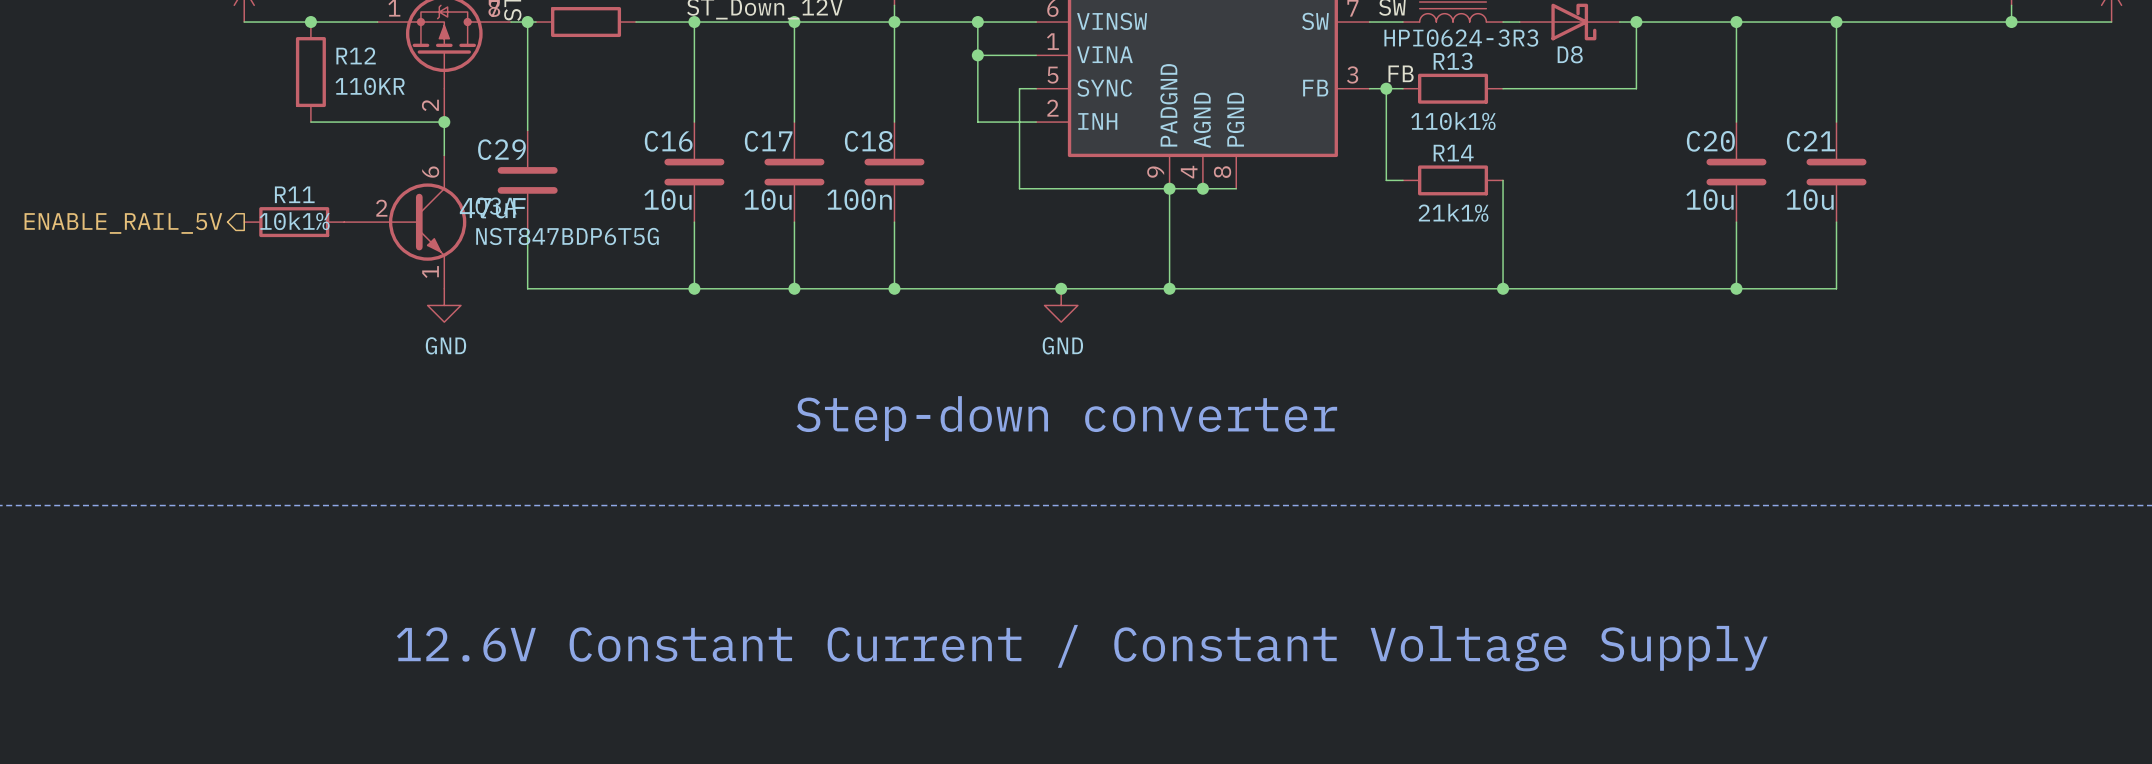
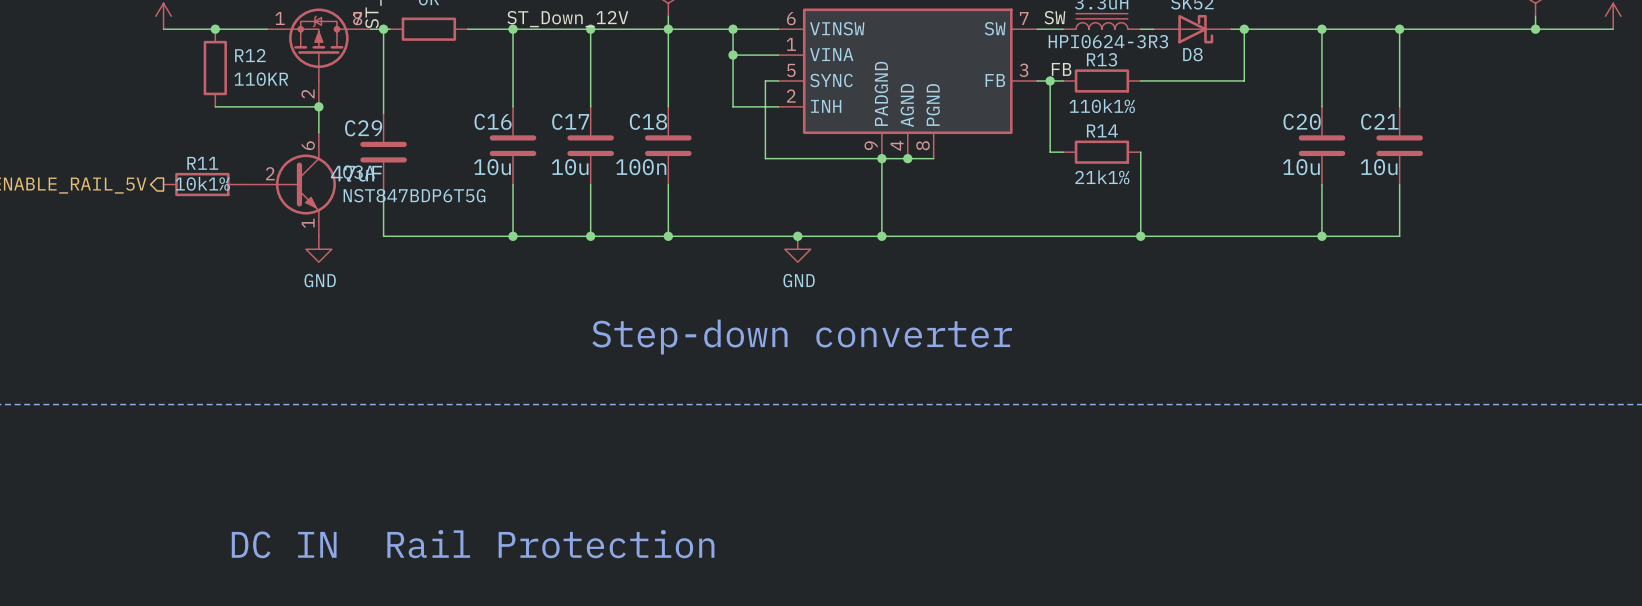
text: 12.6V Constant Current / Constant Voltage Supply (1082, 648) -> none
text: none -> DC IN Rail Protection (473, 544)

